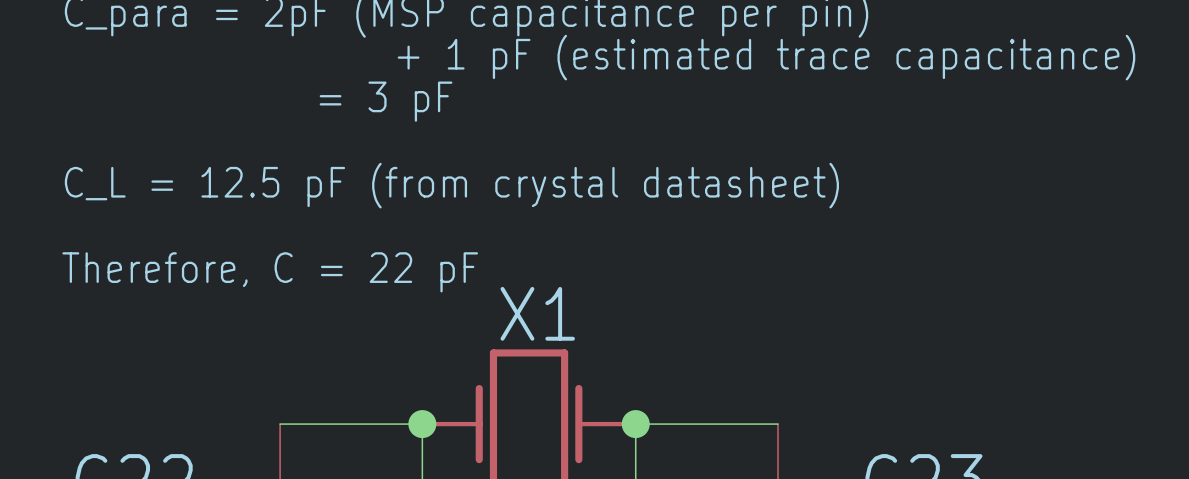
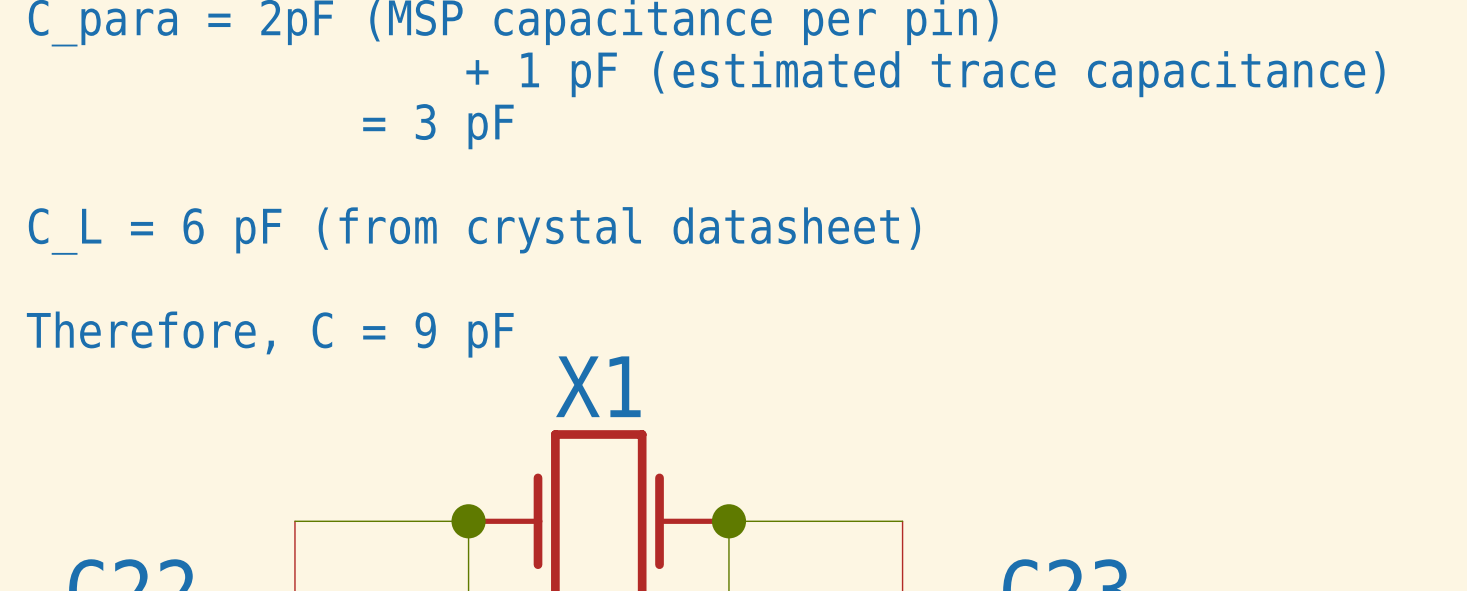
text: C_L = 12.5 pF (from crystal datasheet) (451, 185) -> C_L = 6 pF (from crystal datasheet) (474, 230)
text: Therefore, C = 22 pF (270, 272) -> Therefore, C = 9 pF (270, 334)

